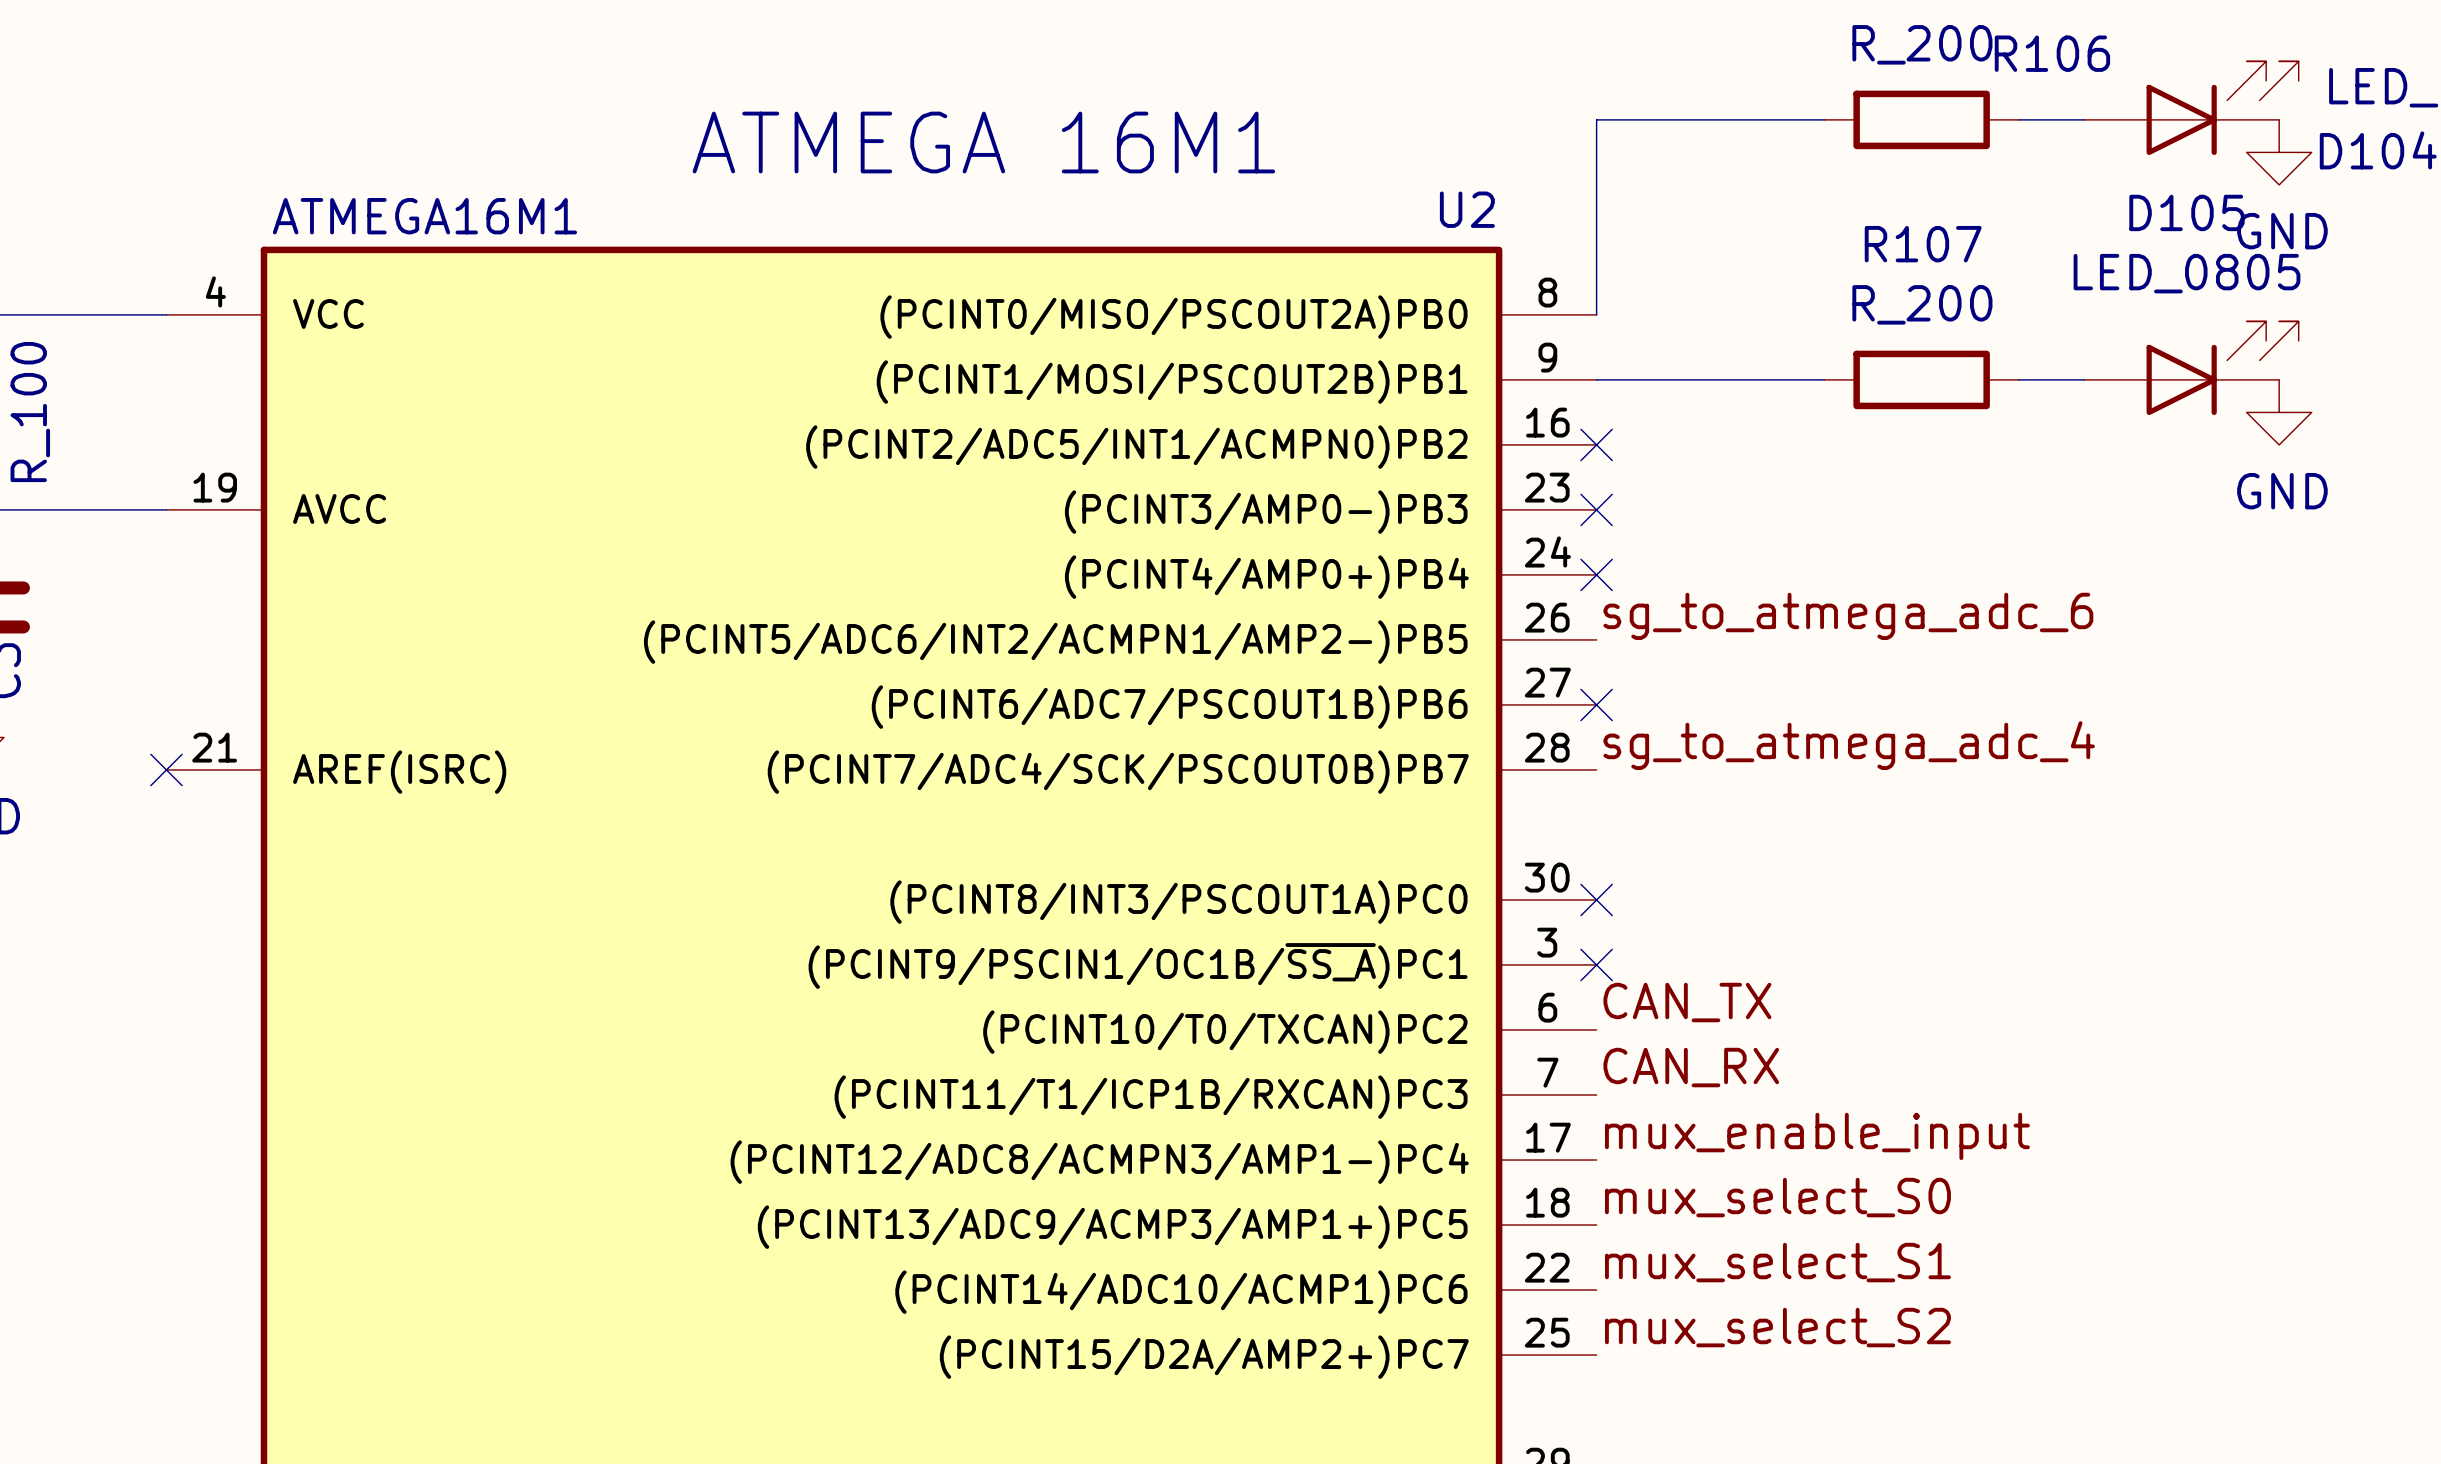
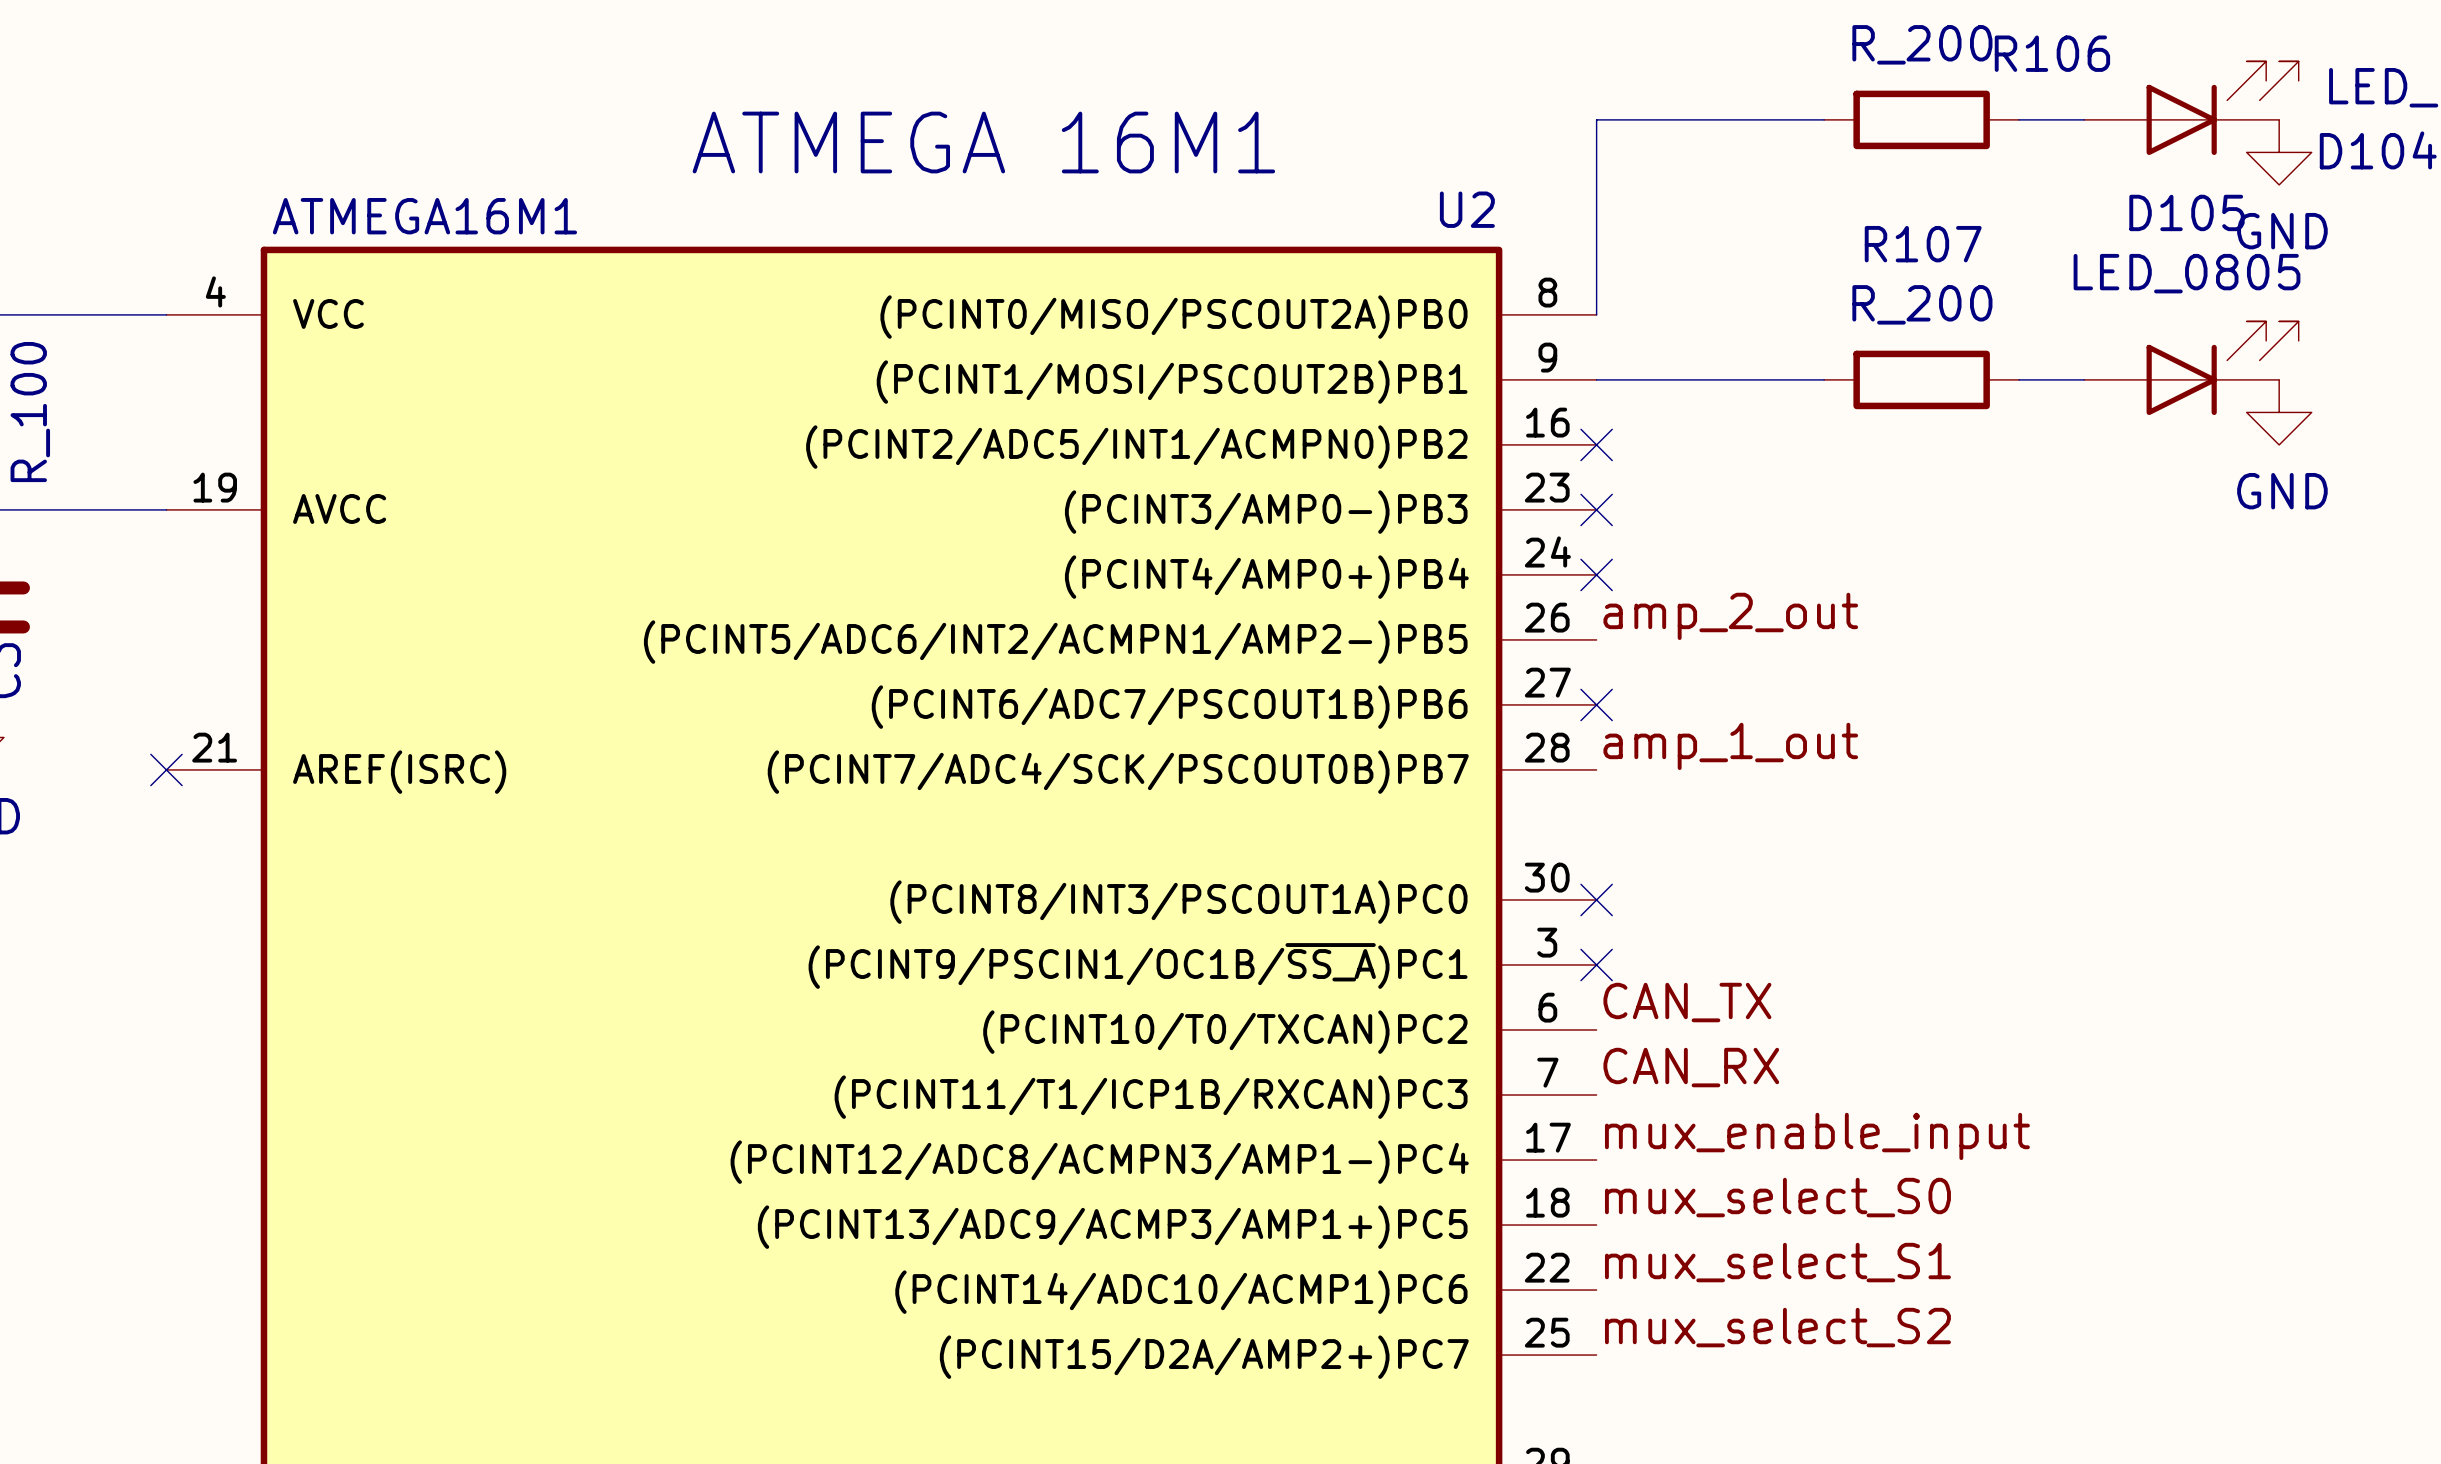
label: sg_to_atmega_adc_6 (1848, 616) -> amp_2_out (1730, 616)
label: sg_to_atmega_adc_4 (1849, 745) -> amp_1_out (1730, 746)

